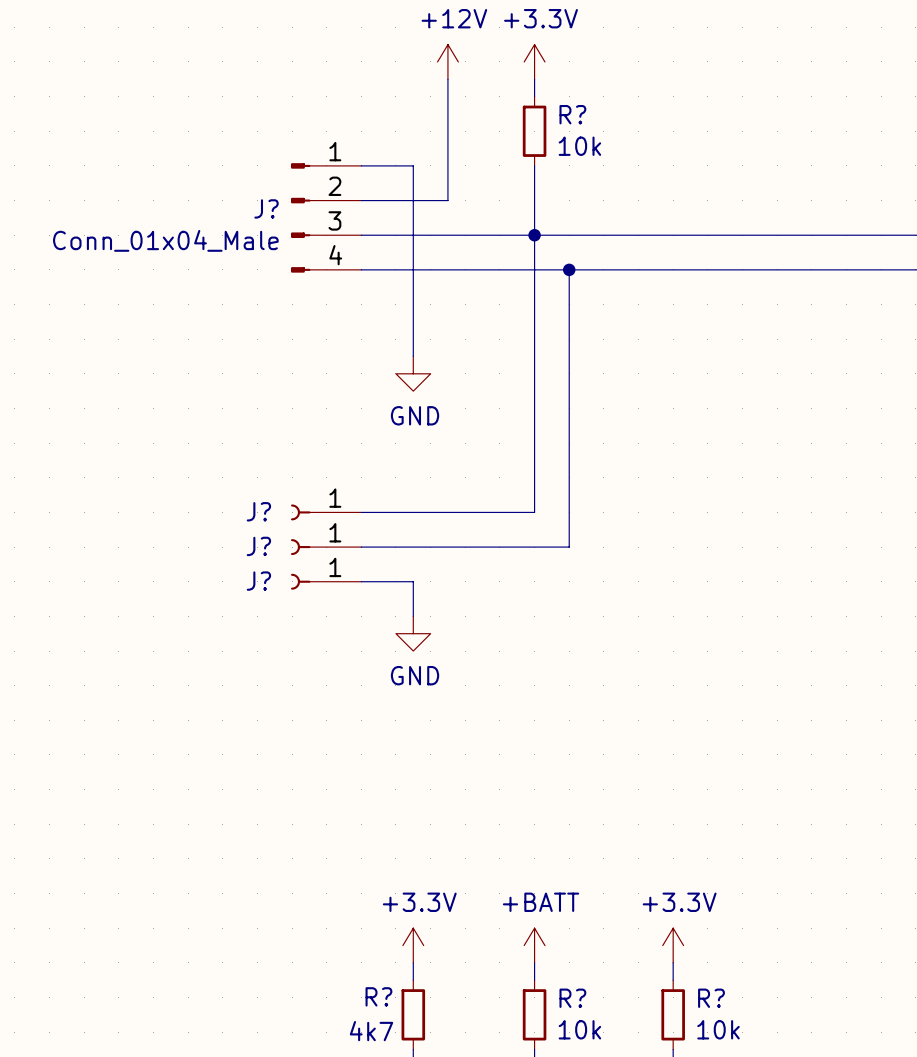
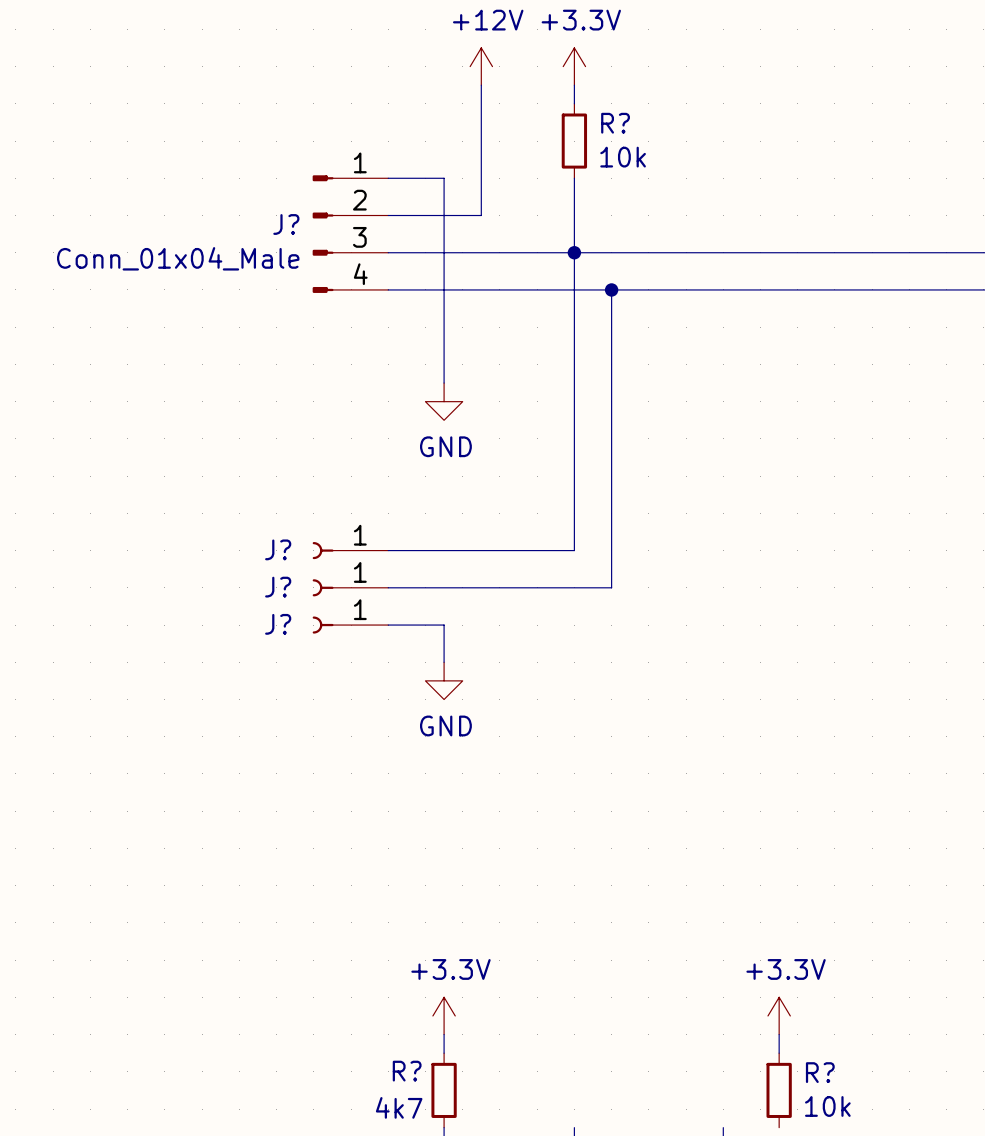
power symbol: +BATT (534, 945) -> none
power symbol position: +3.3V (673, 945) -> +3.3V (779, 1015)
wire: (534, 962) (534, 980) -> none
wire: (673, 962) (673, 980) -> (779, 1034) (779, 1053)
R?: 10k (534, 1014) -> none
R? position: (673, 1014) -> (779, 1090)

